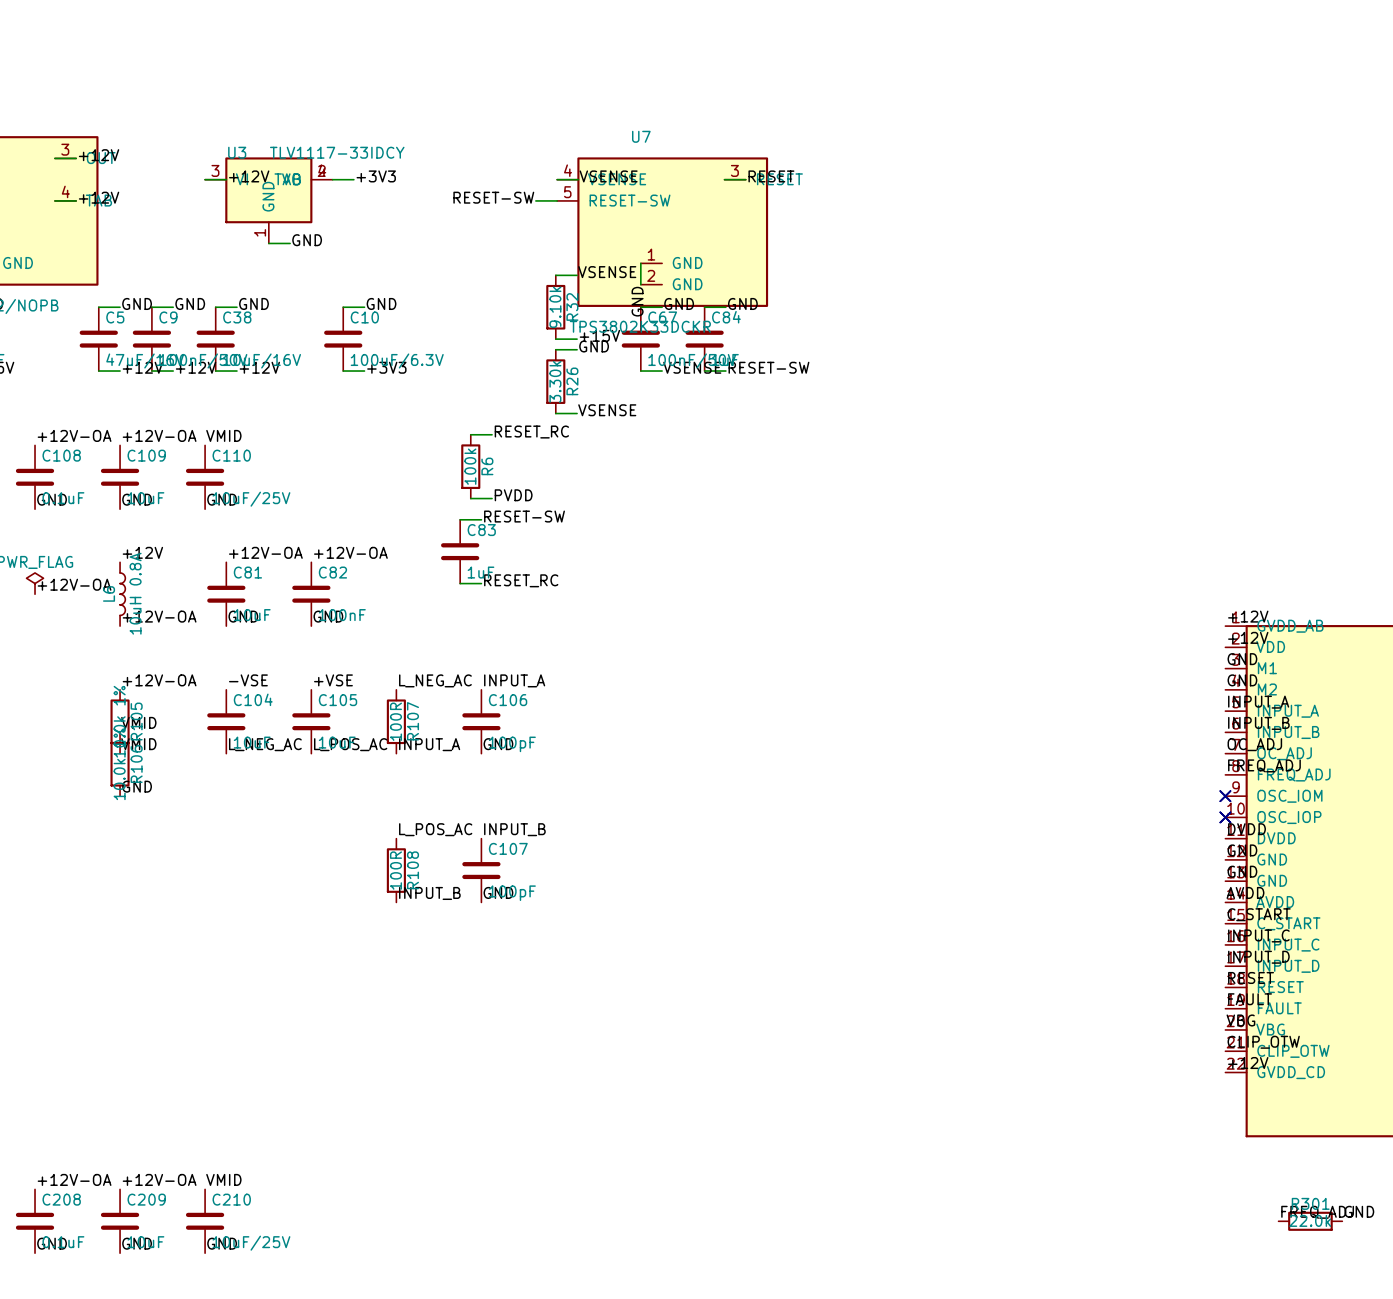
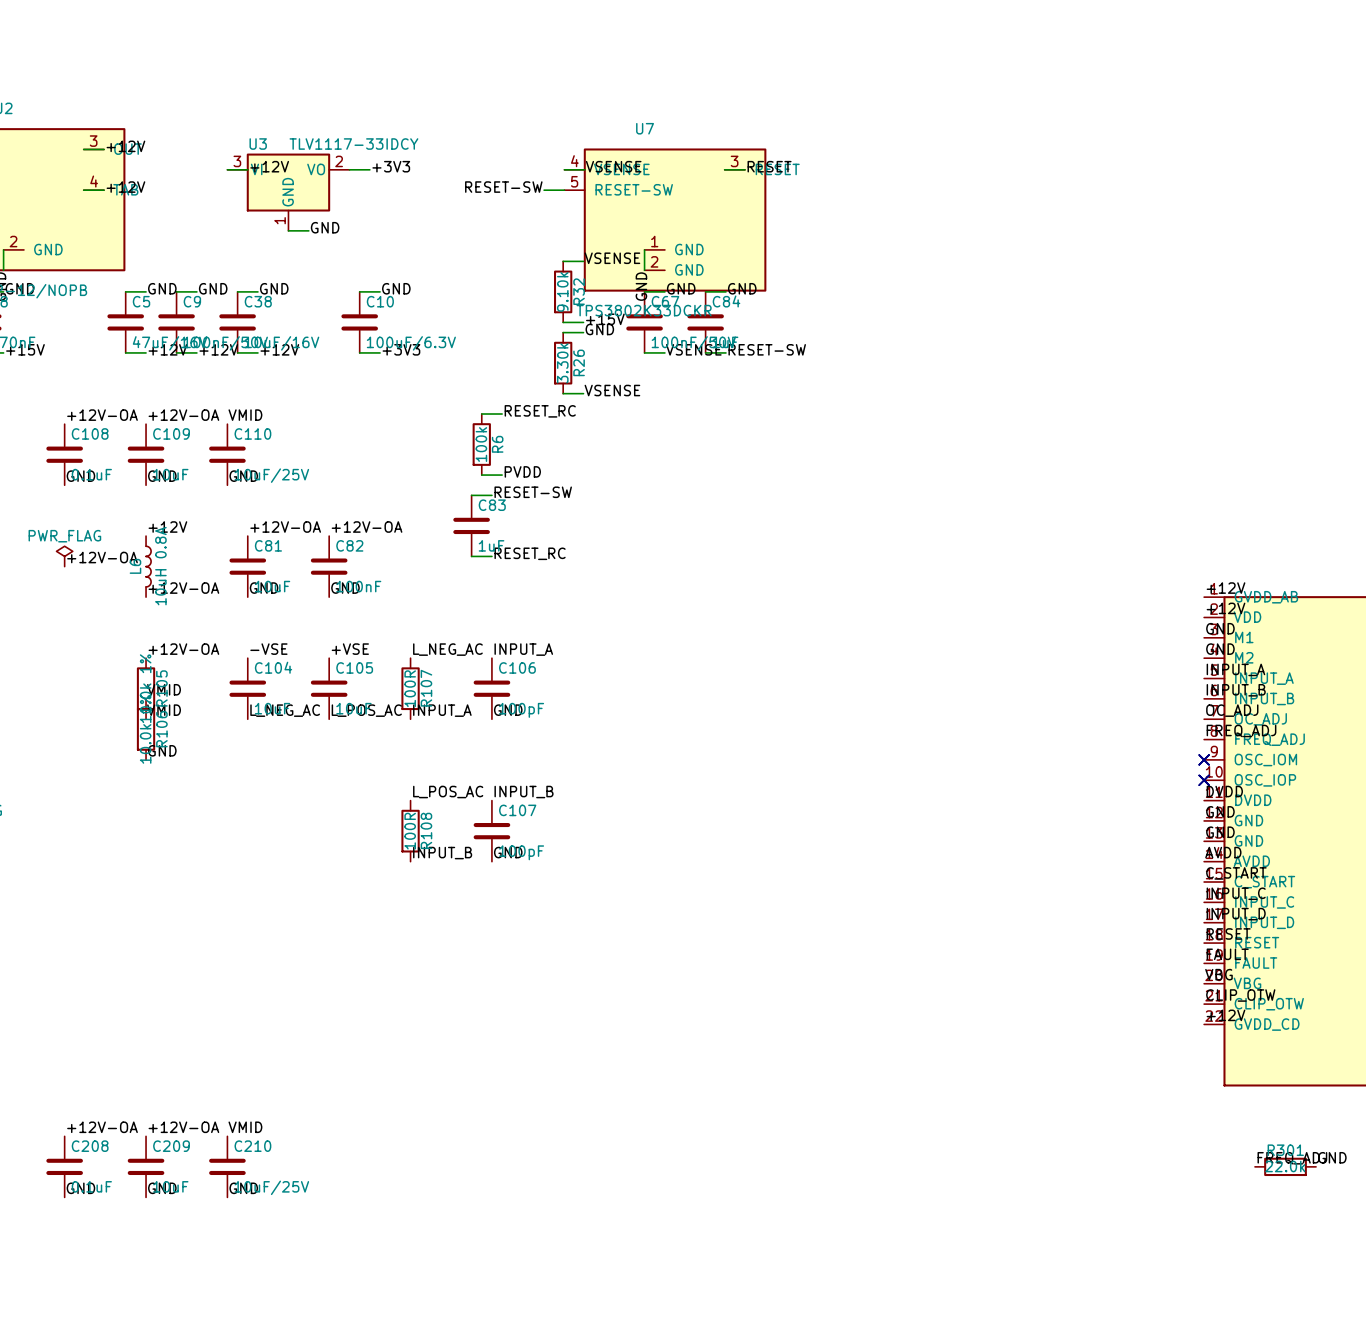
U3 symbol: [205, 157, 333, 244] -> [227, 153, 350, 231]

